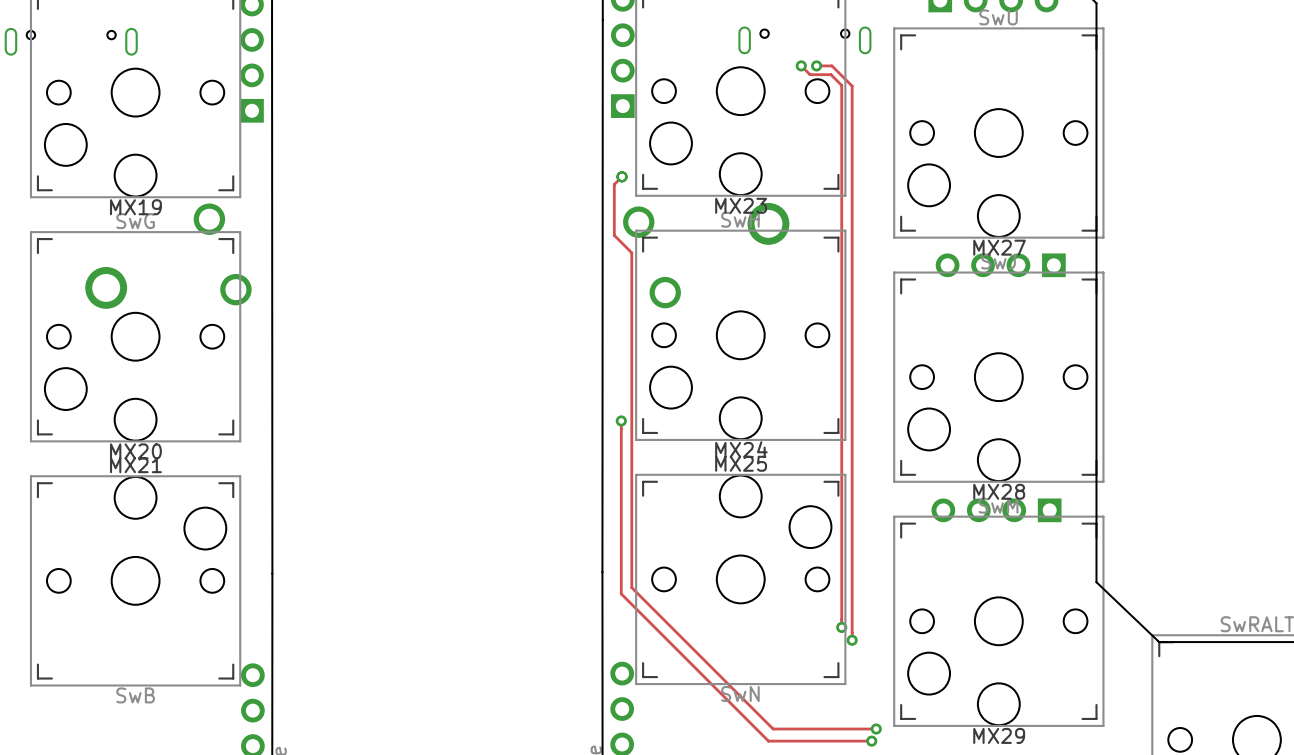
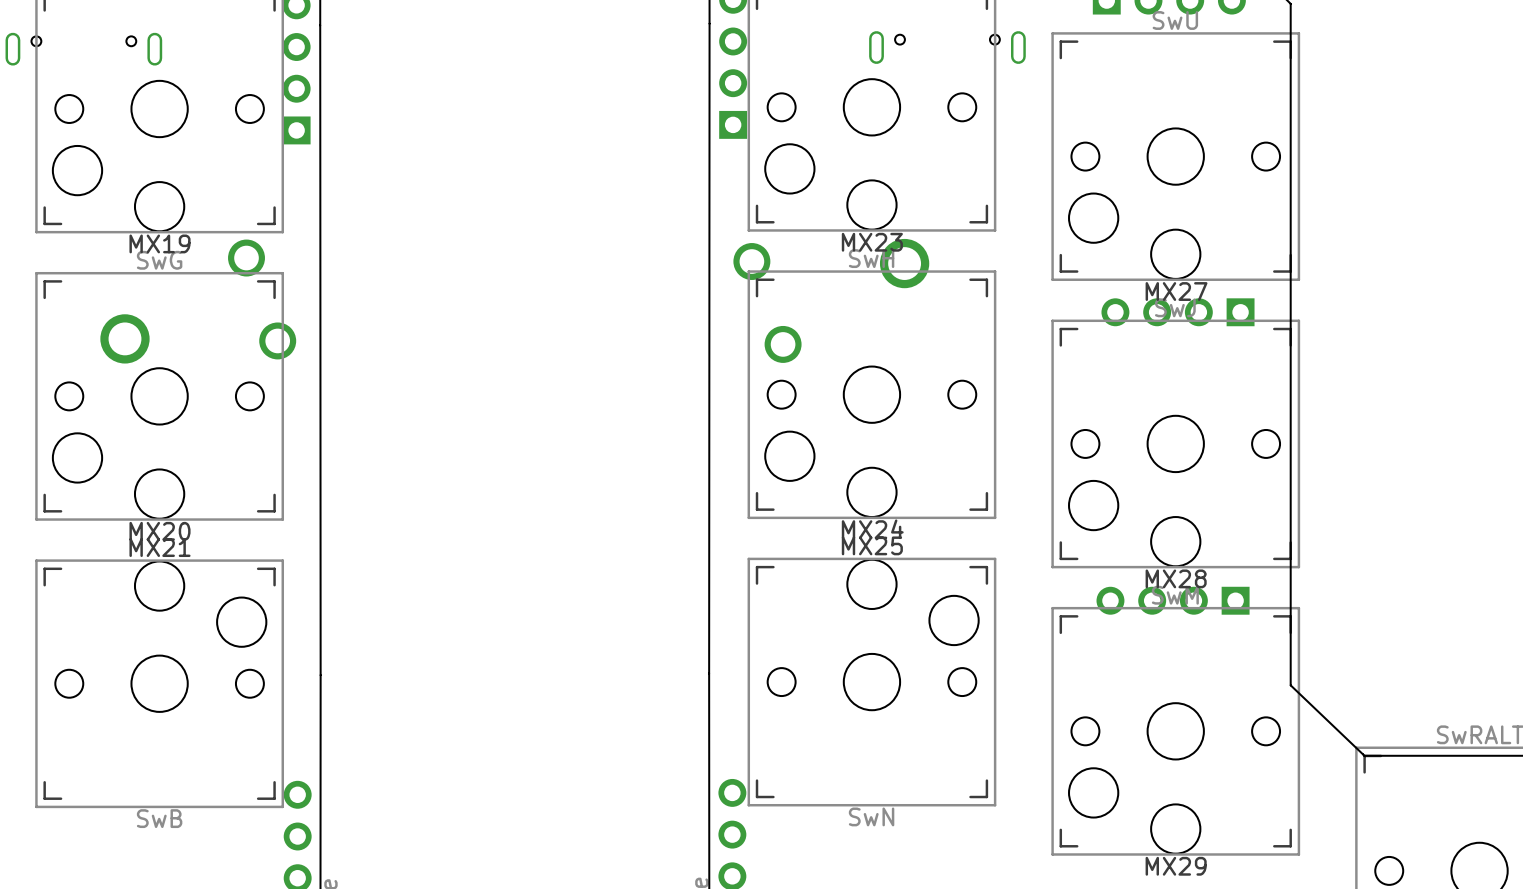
track: (801, 65) (810, 74) (830, 74) (841, 85) (841, 627) -> none
via: (801, 65) -> none
track: (816, 65) (831, 65) (852, 86) (852, 640) -> none
via: (816, 65) -> none
track: (622, 176) (614, 184) (614, 235) (631, 252) (631, 587) (773, 729) (876, 729) -> none
via: (622, 176) -> none
track: (621, 420) (621, 593) (768, 741) (871, 741) -> none
via: (621, 420) -> none
via: (841, 627) -> none
via: (852, 640) -> none
via: (876, 729) -> none
via: (871, 741) -> none

